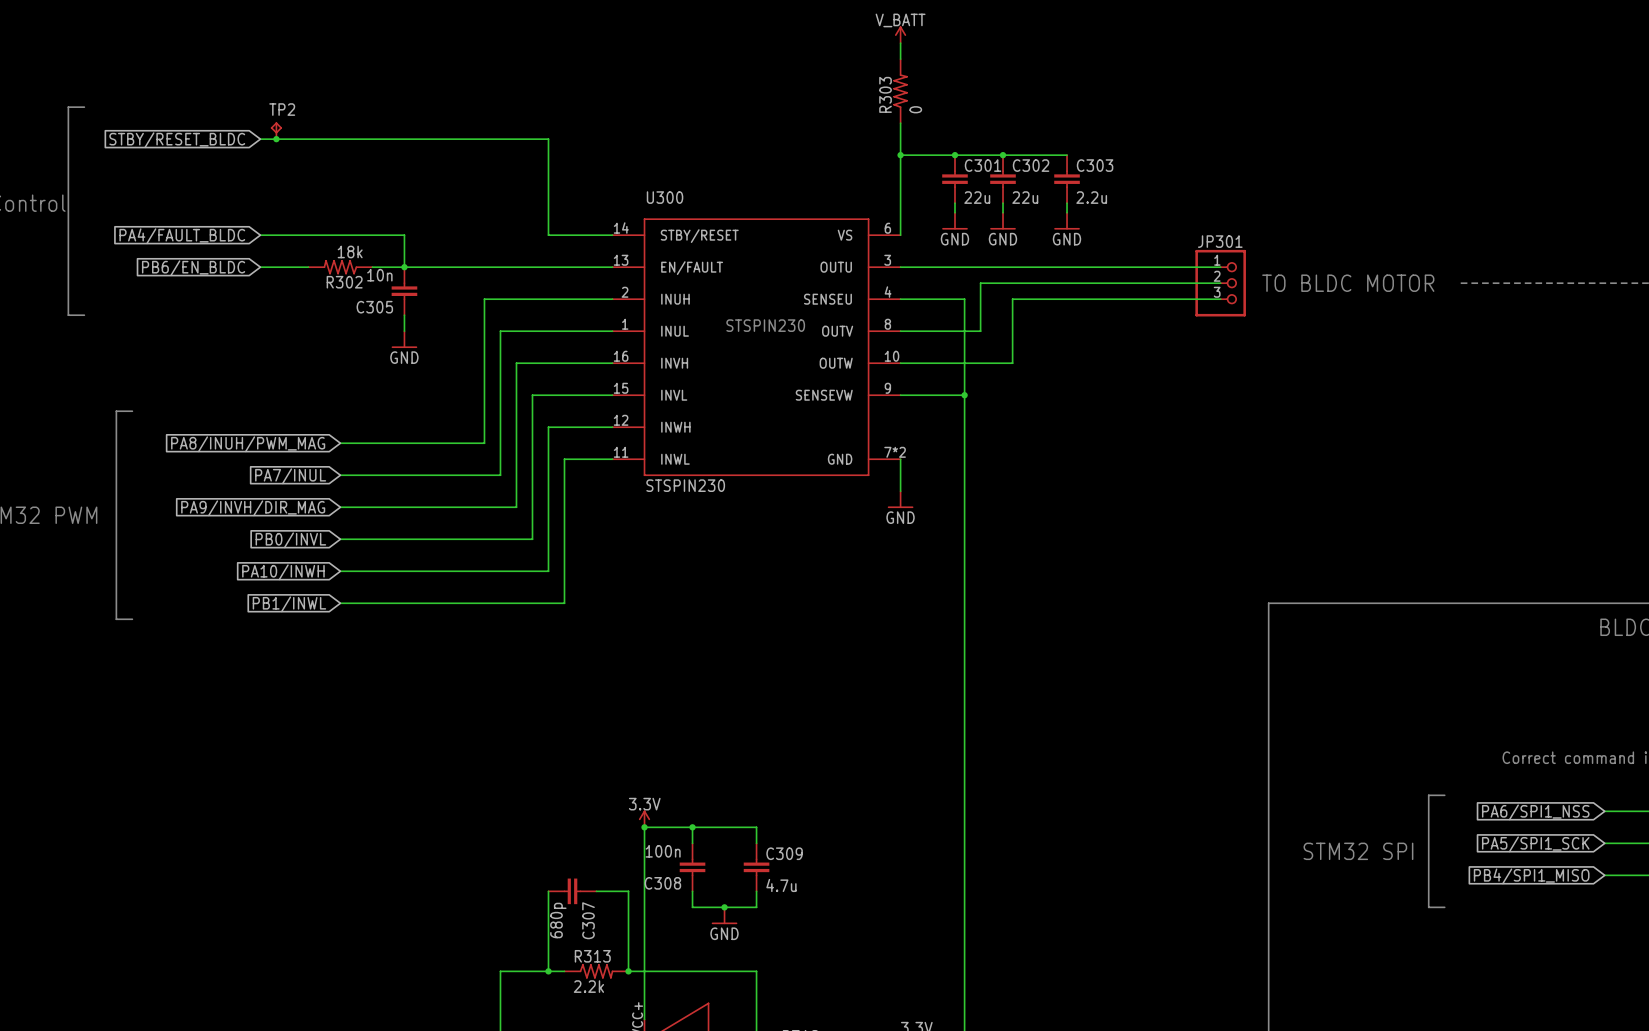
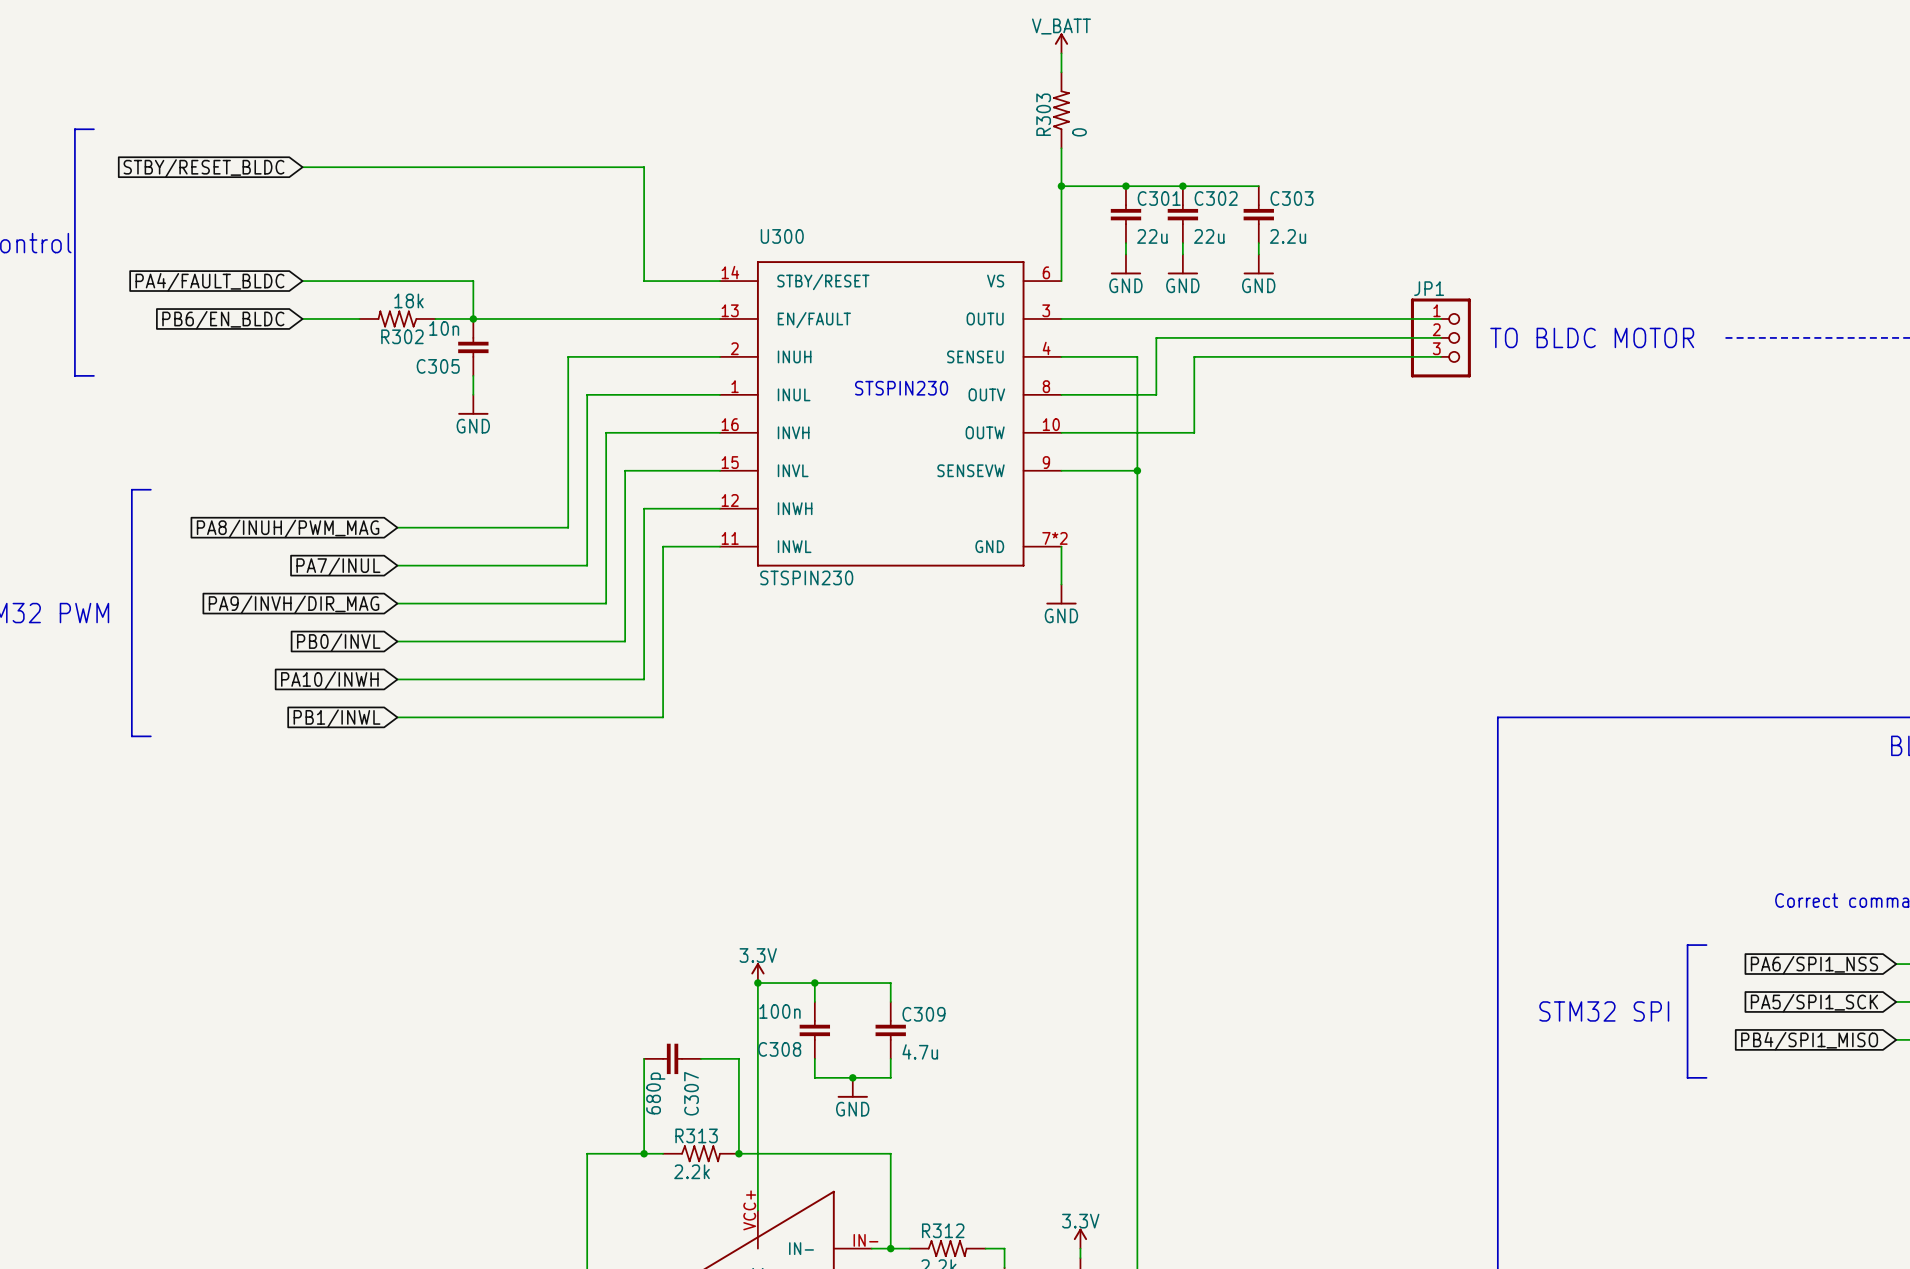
TP2: (276, 130) -> none
junction: (276, 139) -> none
JP301 name: JP301 (1220, 241) -> JP1 (1429, 288)

